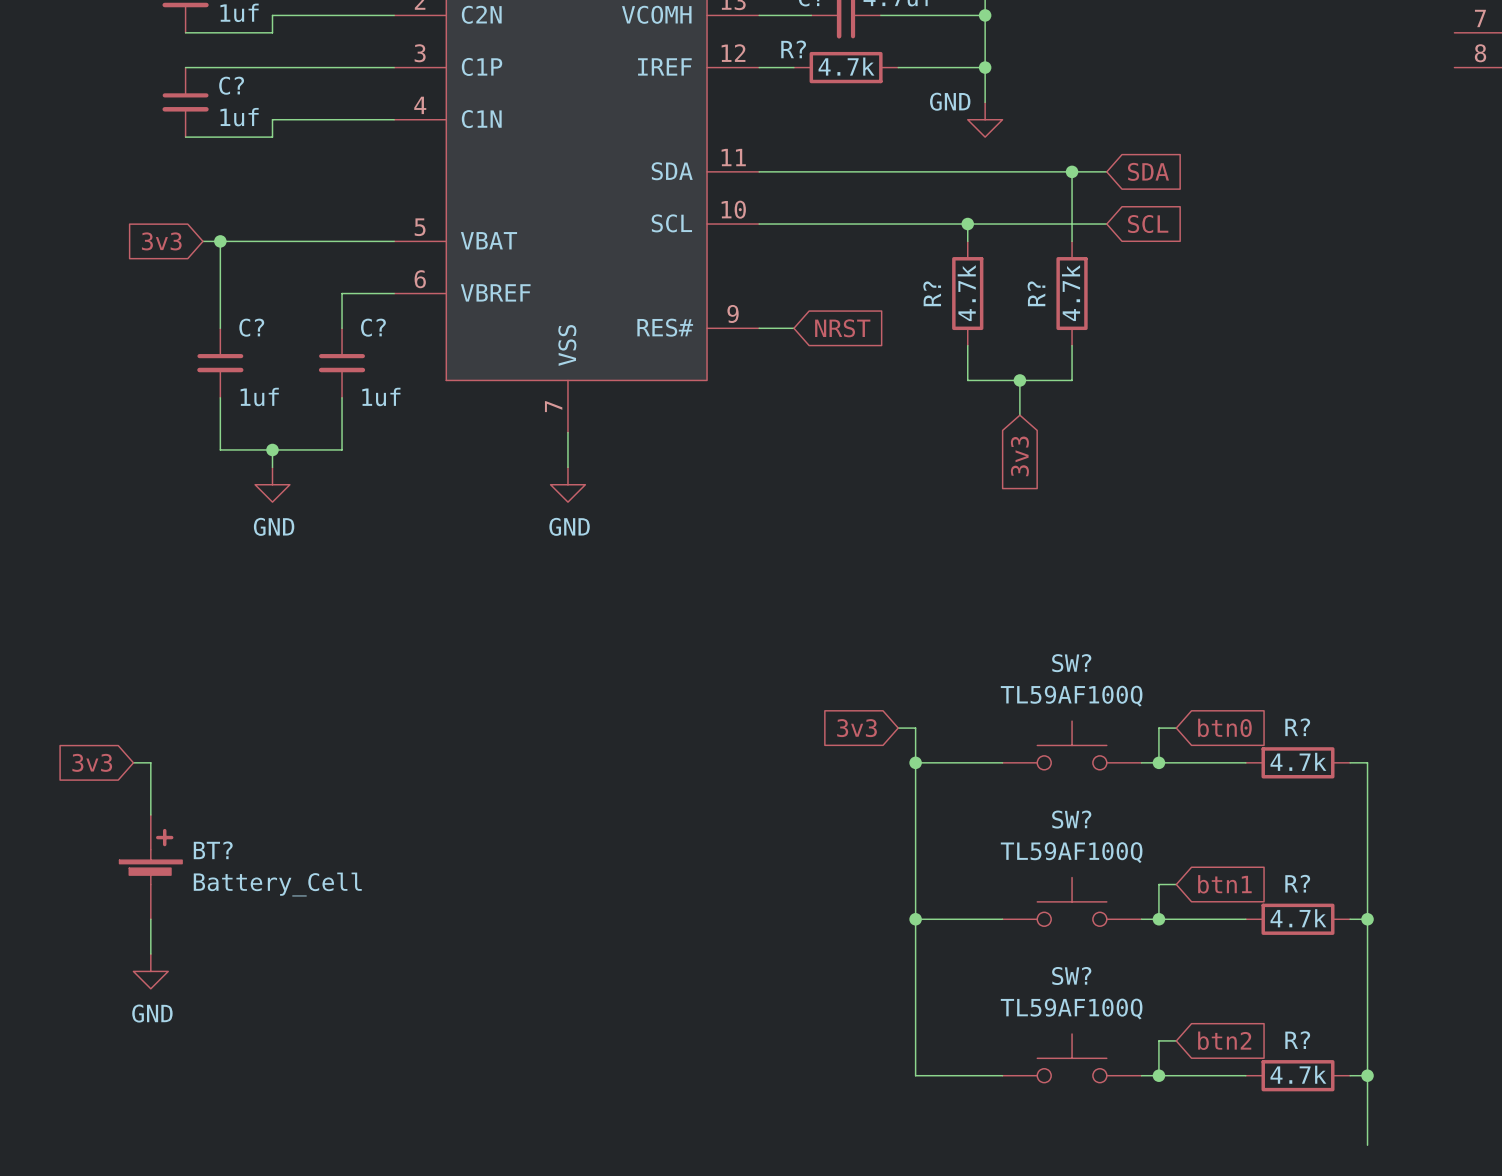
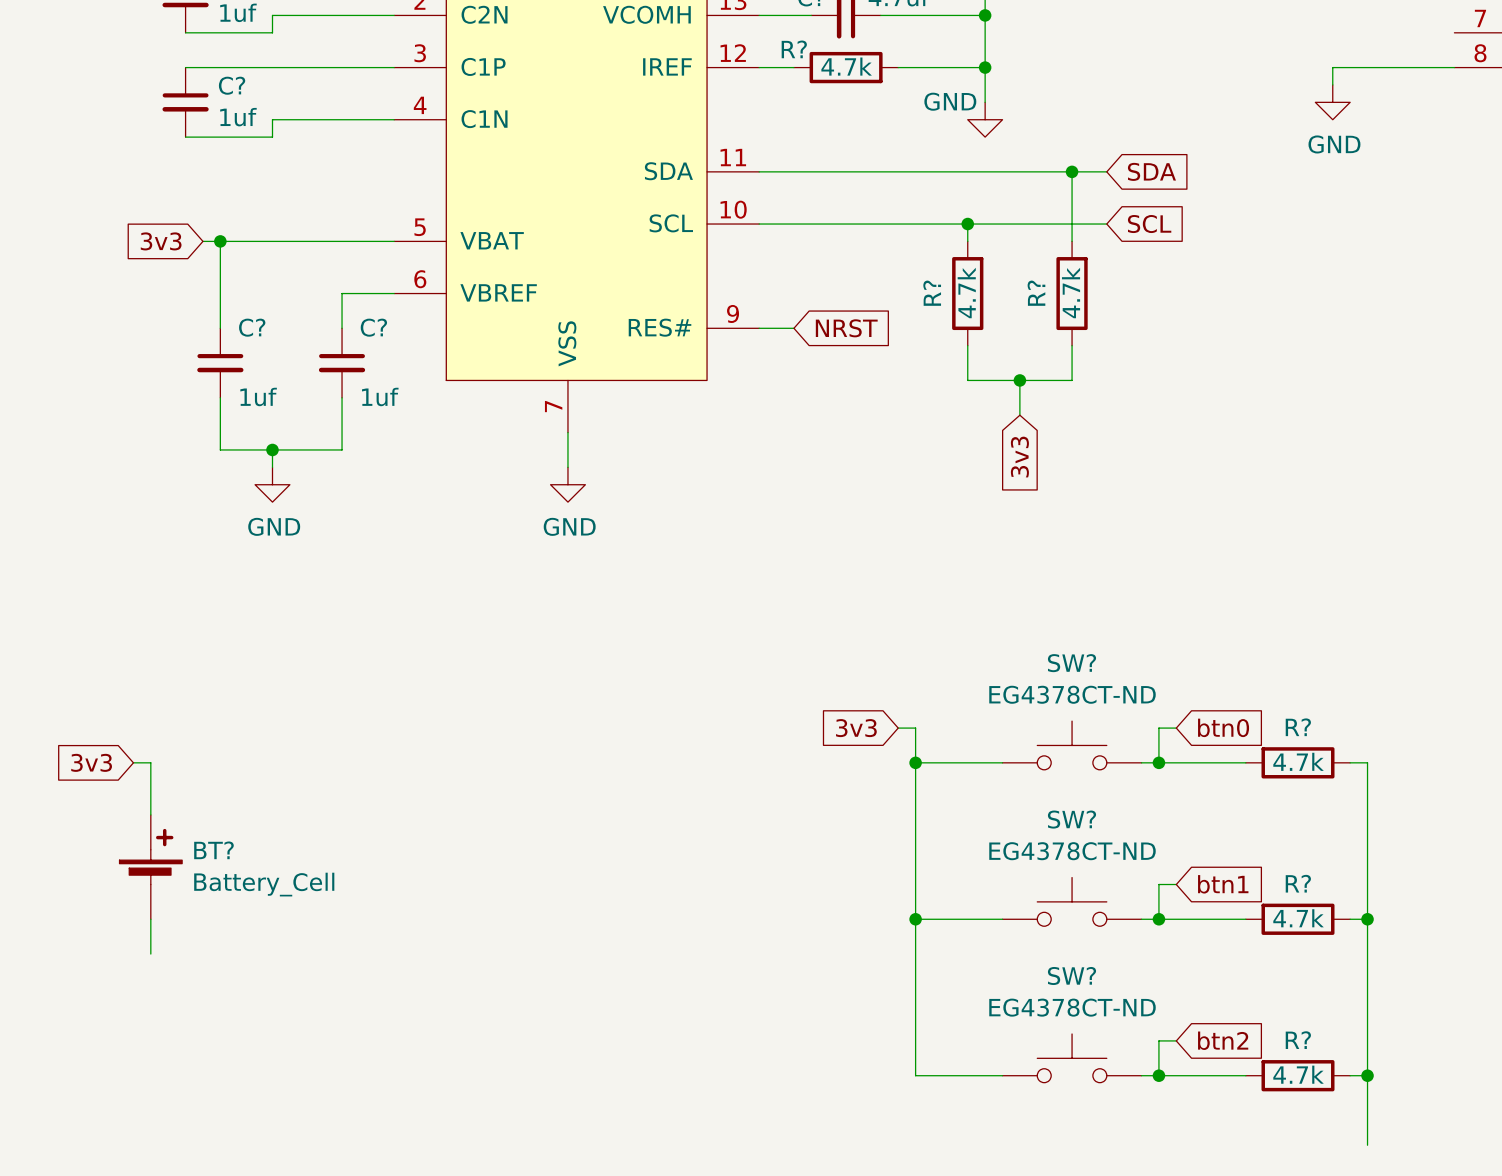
wire: none -> (1454, 67) (1332, 67) (1332, 84)
power symbol: none -> GND (1332, 102)
SW? text: TL59AF100Q (1071, 696) -> EG4378CT-ND (1072, 694)
SW? text: TL59AF100Q (1071, 852) -> EG4378CT-ND (1072, 851)
power symbol: GND (150, 971) -> none
SW? text: TL59AF100Q (1071, 1009) -> EG4378CT-ND (1072, 1007)

